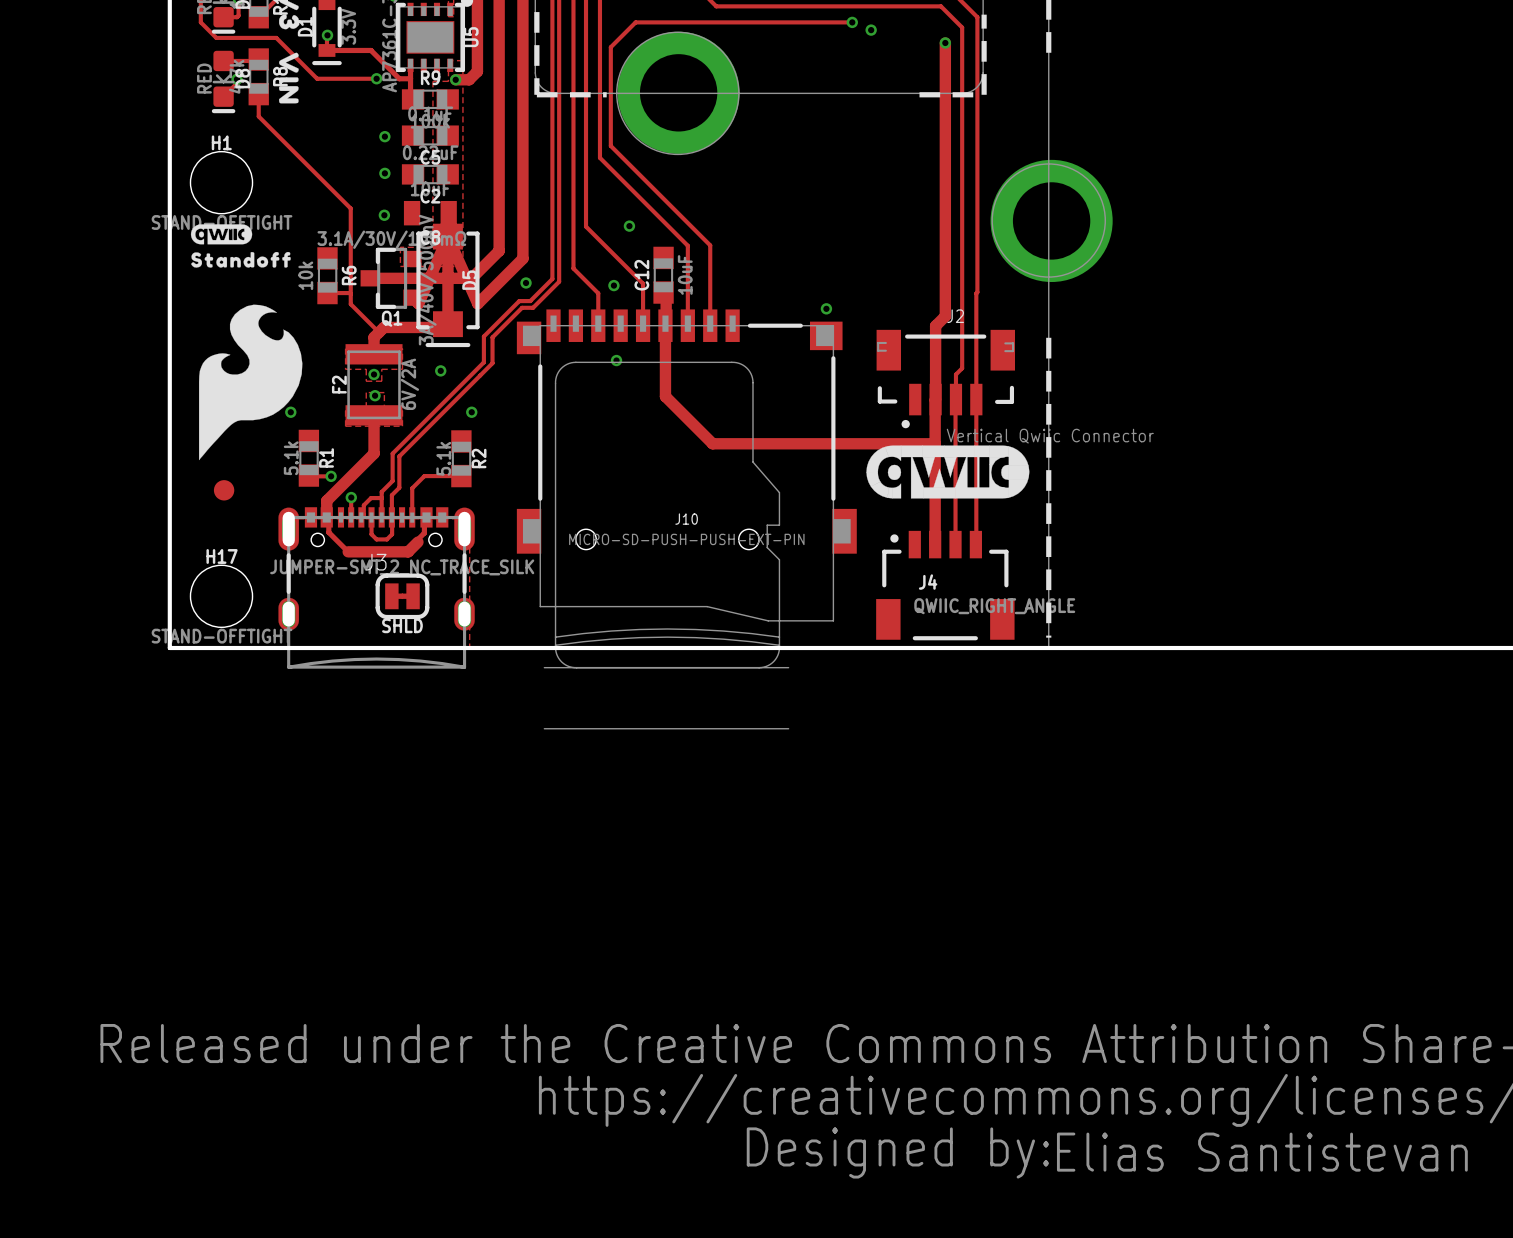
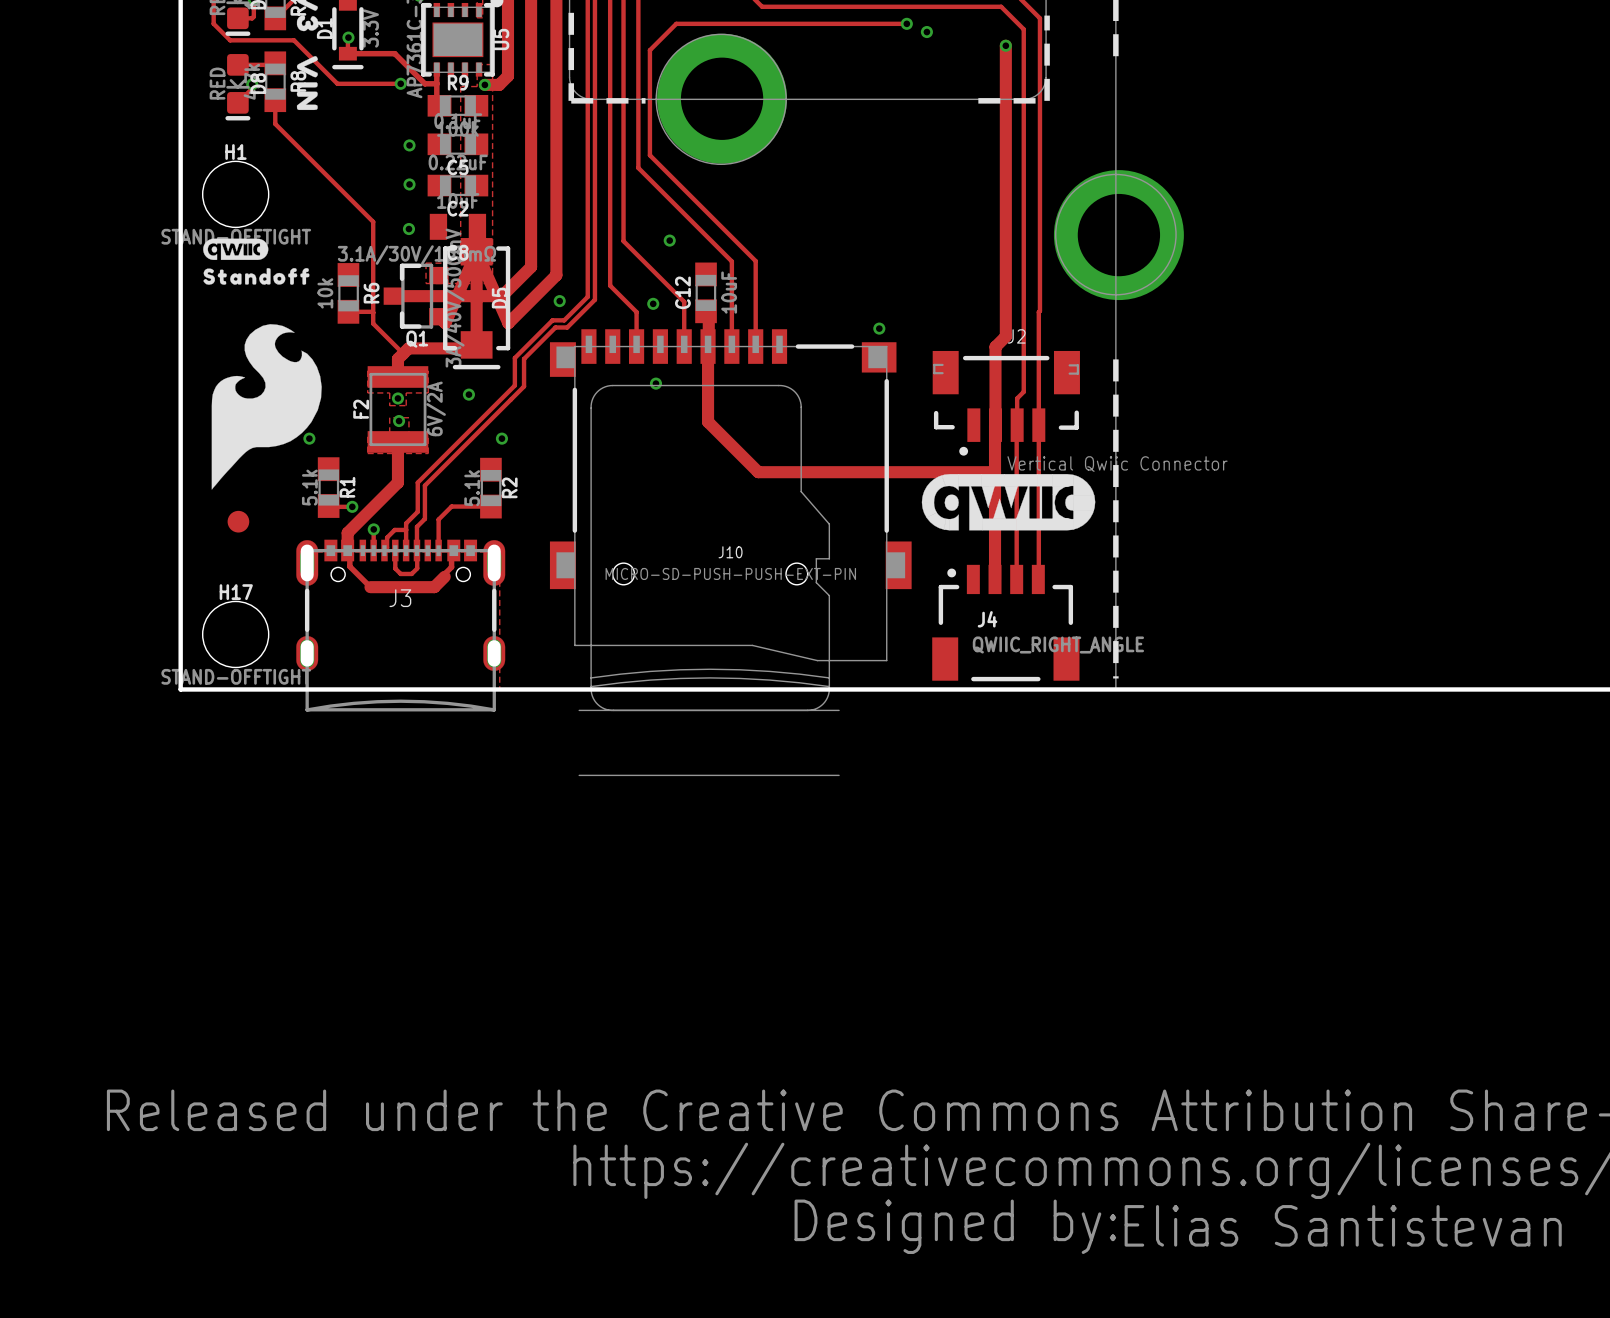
SHLD: JUMPER-SMT_2_NC_TRACE_SILK (402, 596) -> none

